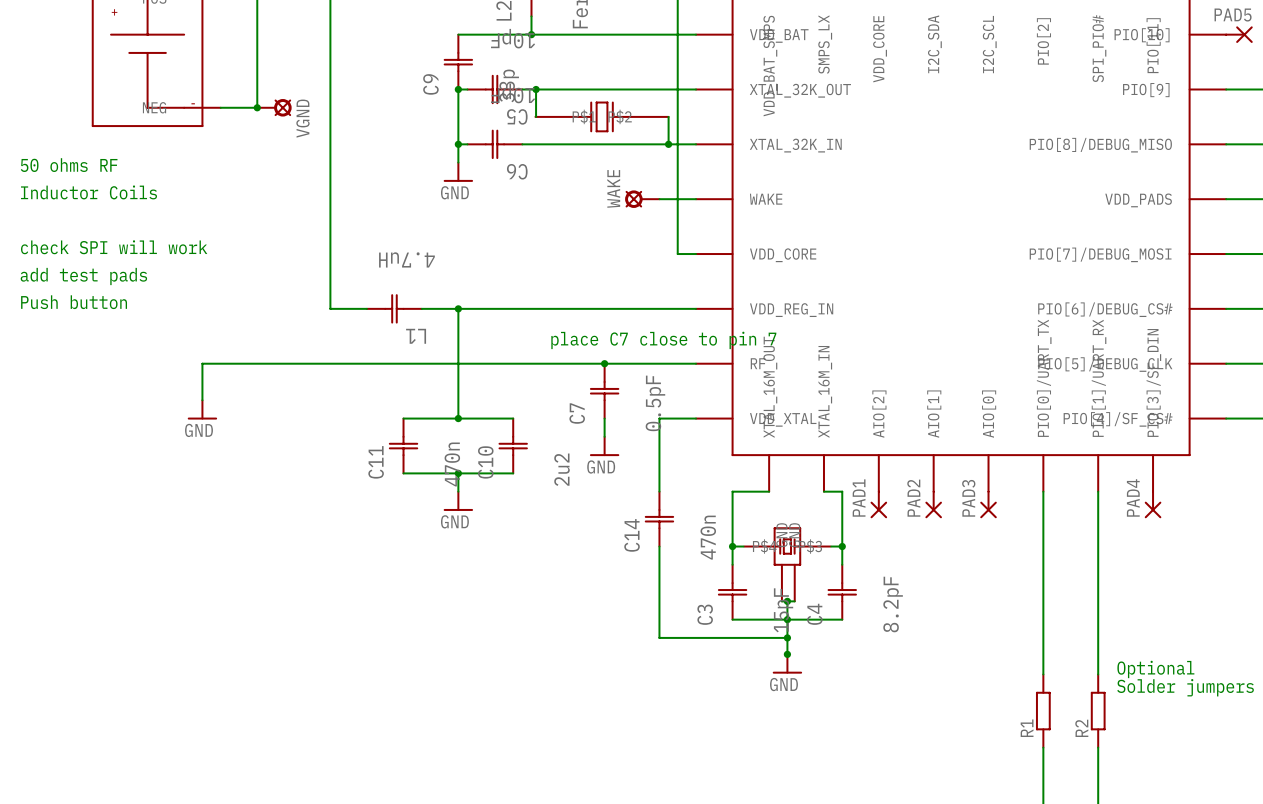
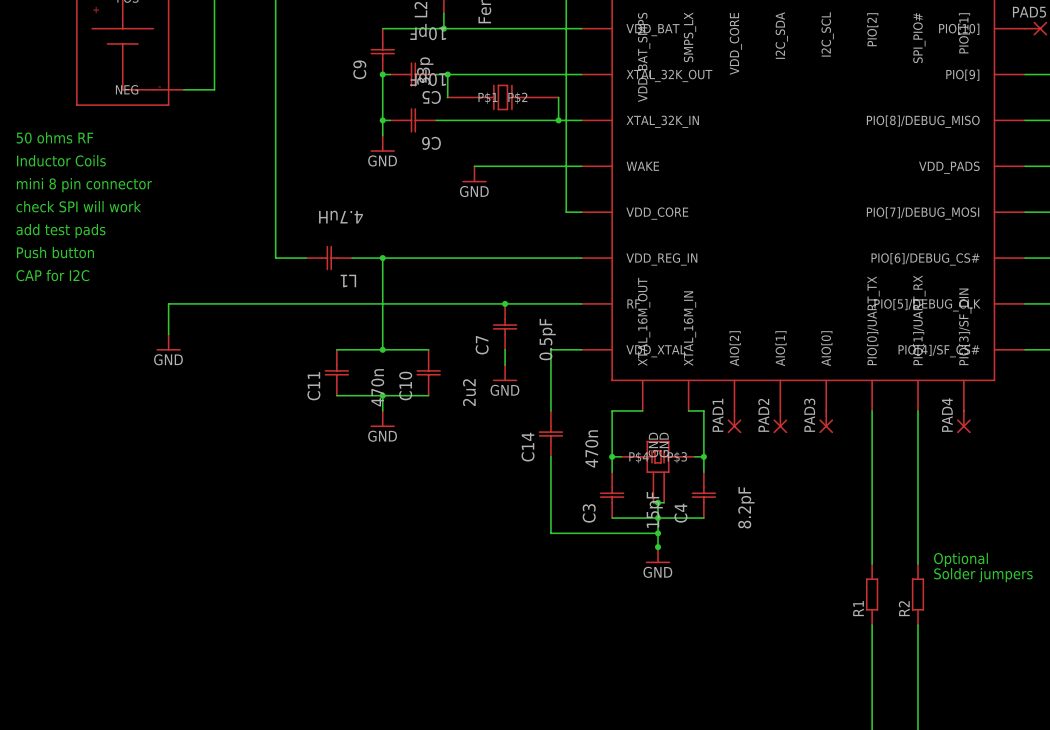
junction: (257, 107) -> none
VGND: (274, 107) -> none
wire: none -> (474, 166) (550, 166)
WAKE: (642, 199) -> none
power symbol: none -> GND (474, 174)
text: none -> mini 8 pin connector (84, 185)
text: none -> CAP for I2C (52, 275)
text: place C7 close to pin 7 (663, 340) -> none

